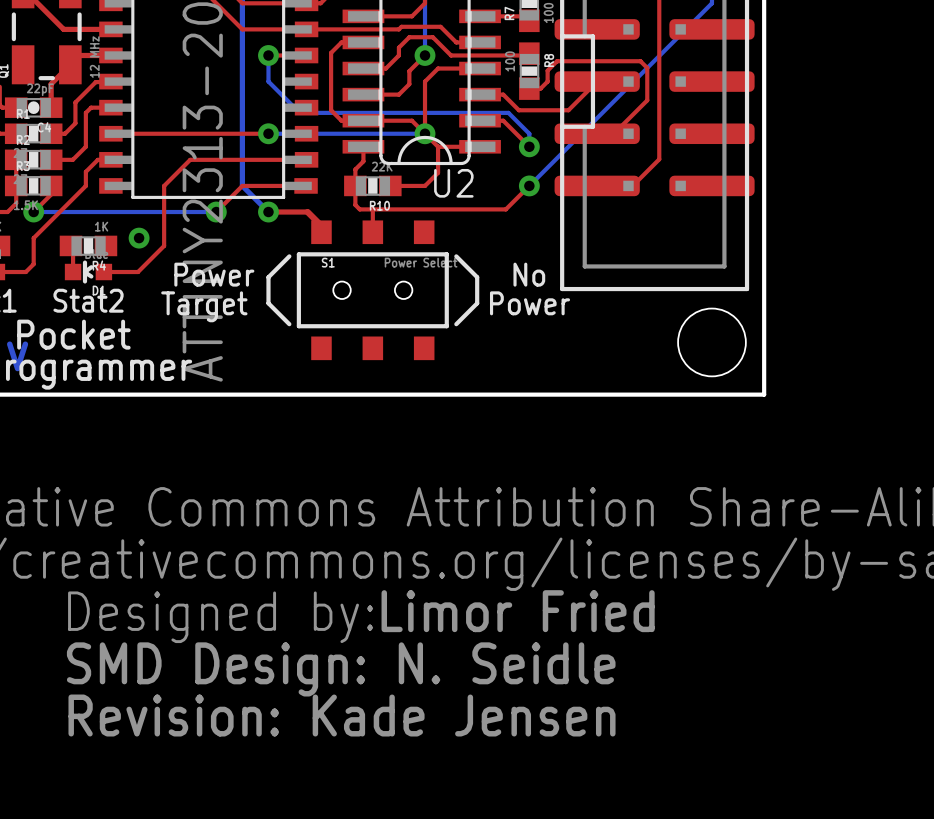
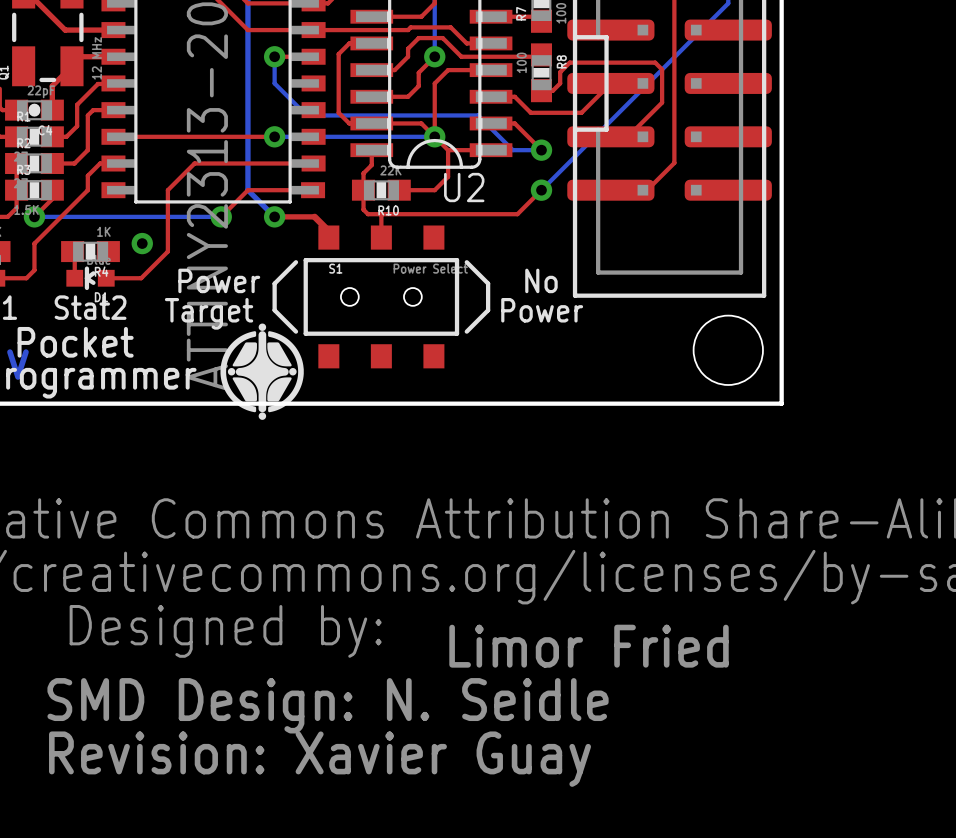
bottom track: (467, 112) (508, 112) (529, 133) (529, 146) -> (478, 115) (512, 150) (541, 150)
drawing: none -> [220, 323, 304, 420]
text position: Limor Fried (518, 611) -> Limor Fried (589, 646)
text position: SMD Design: N. Seidle (341, 669) -> SMD Design: N. Seidle (328, 705)
text: Revision: Kade Jensen (342, 715) -> Revision: Xavier Guay (320, 759)

